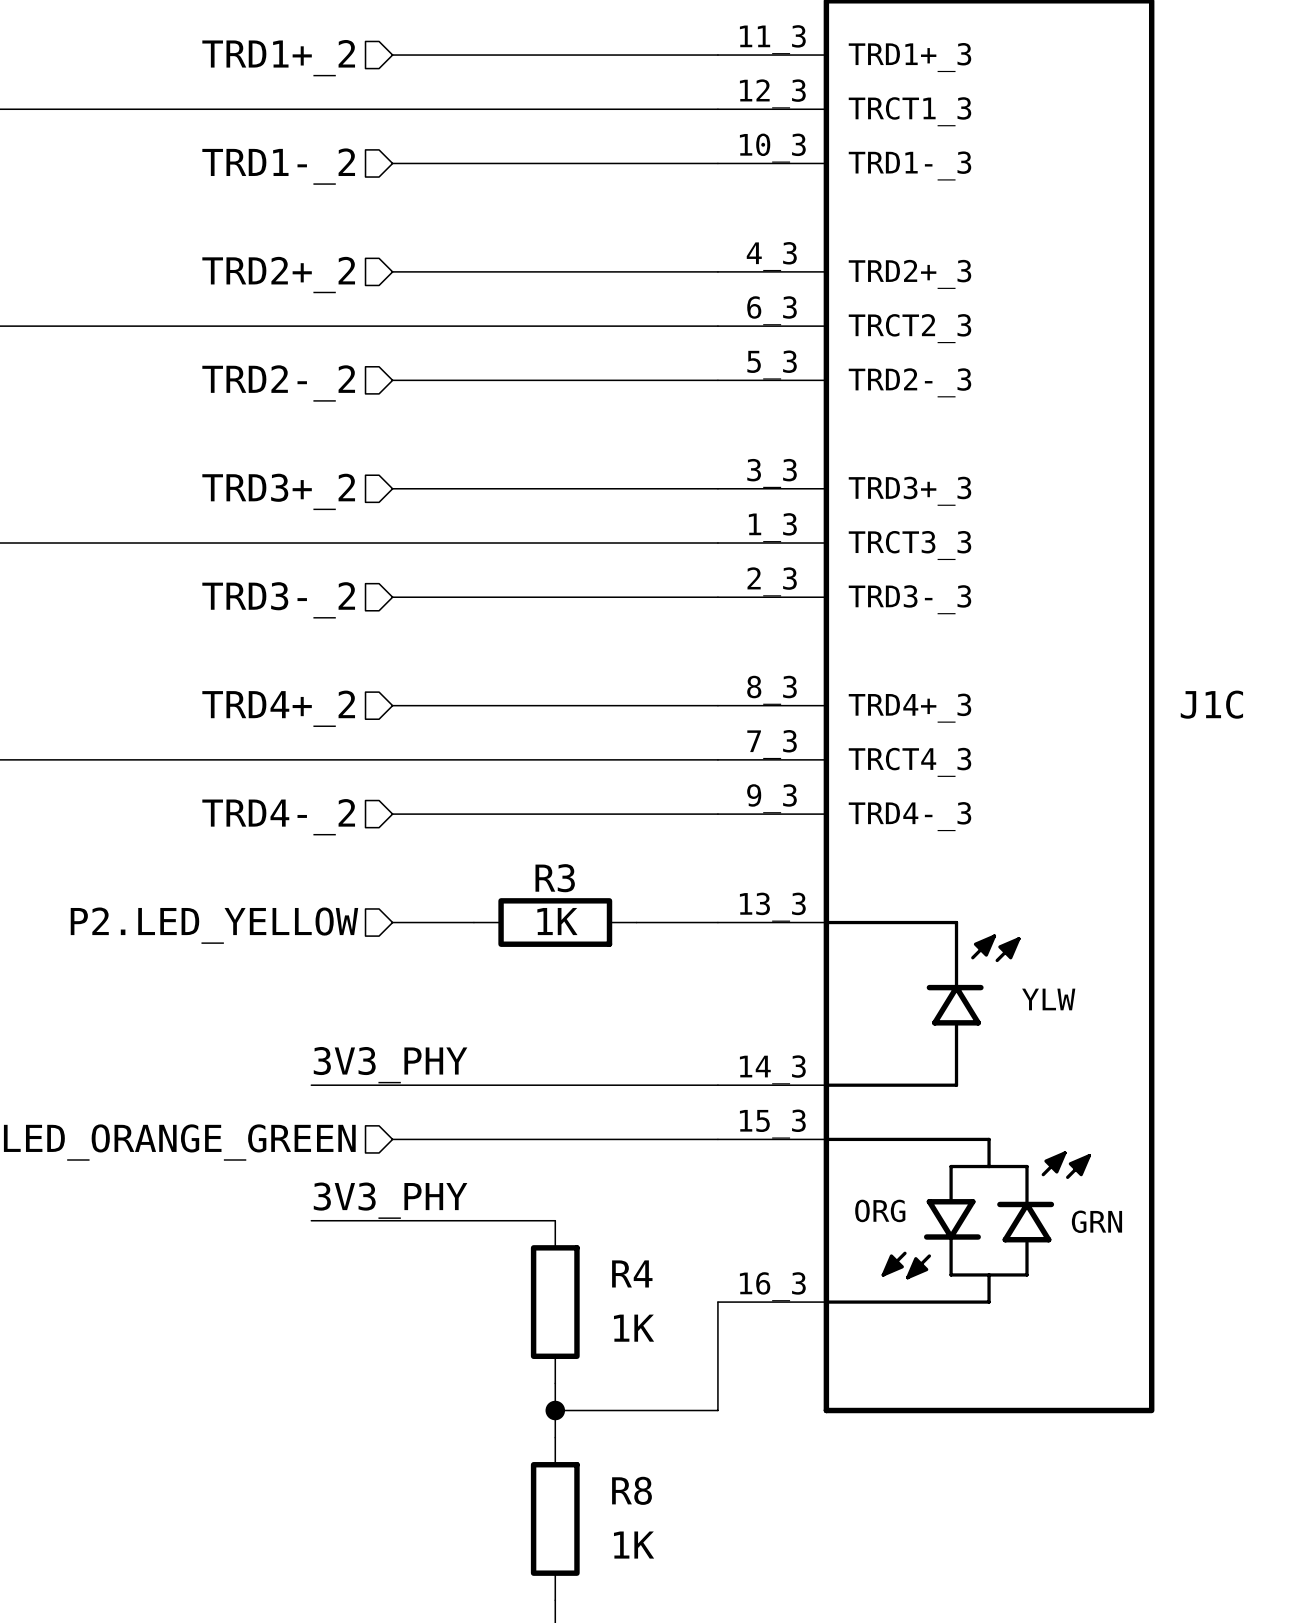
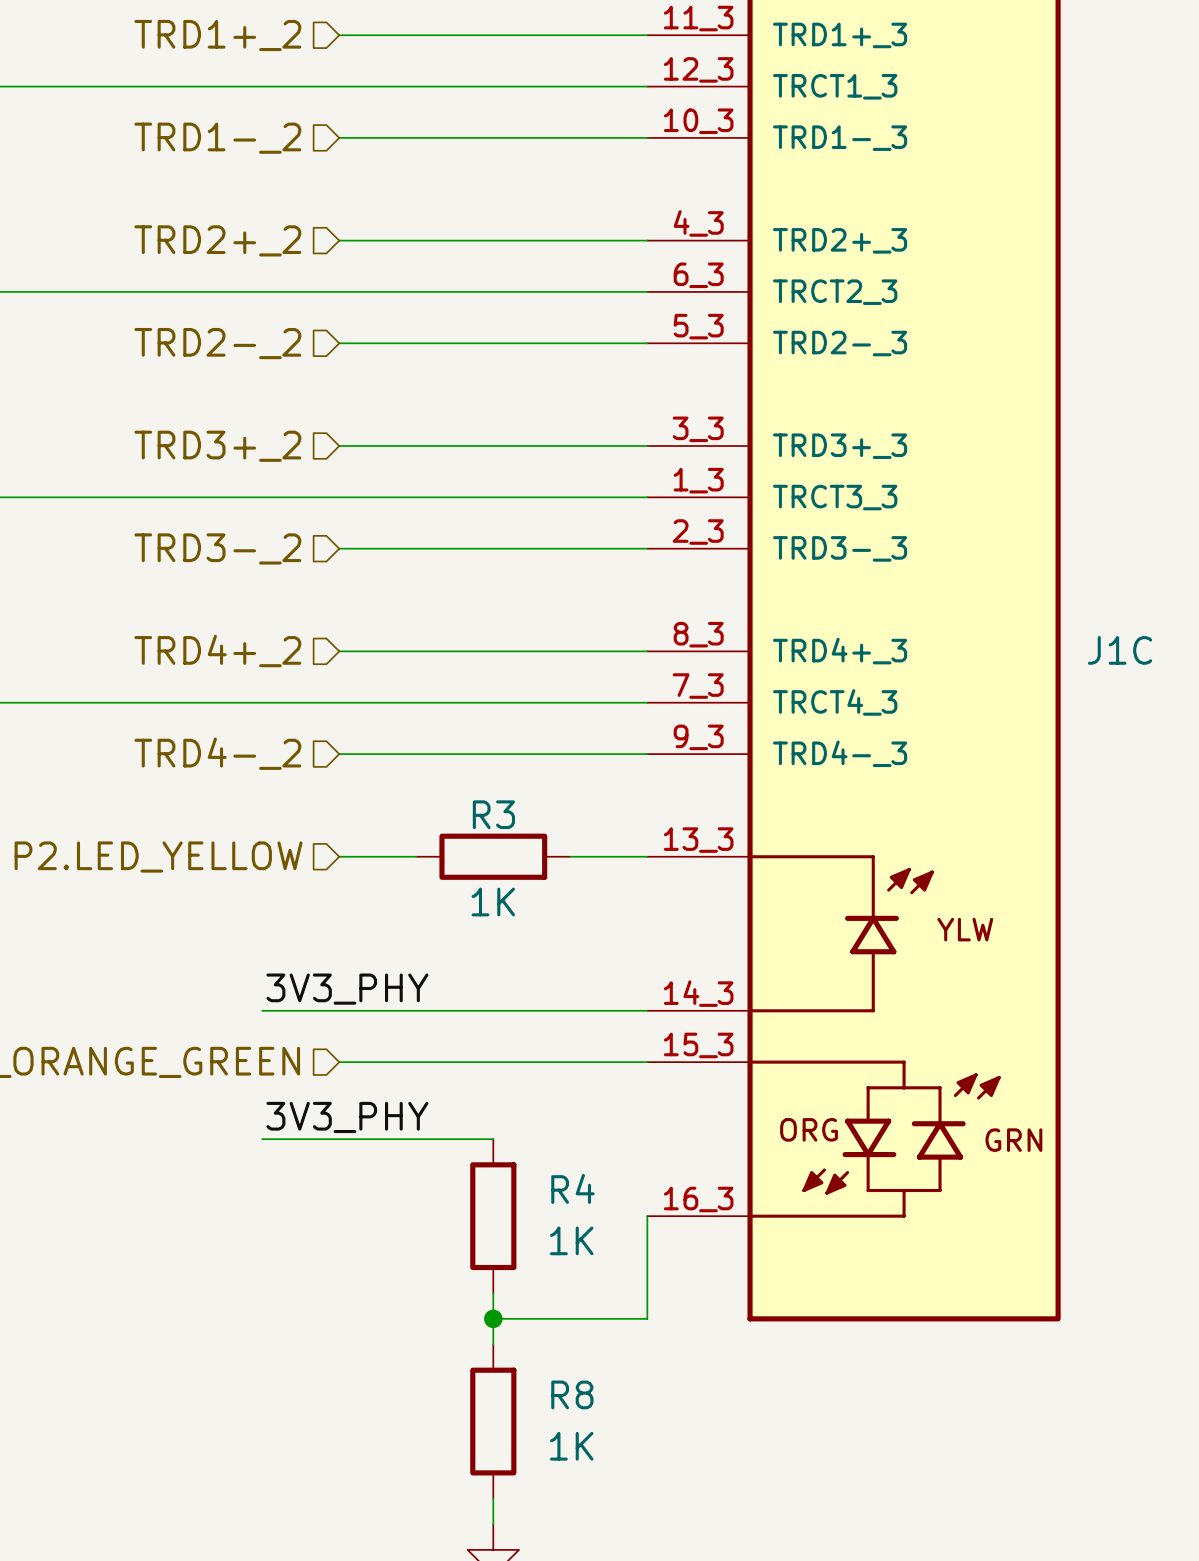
R3 value position: 1K (557, 921) -> 1K (493, 902)

